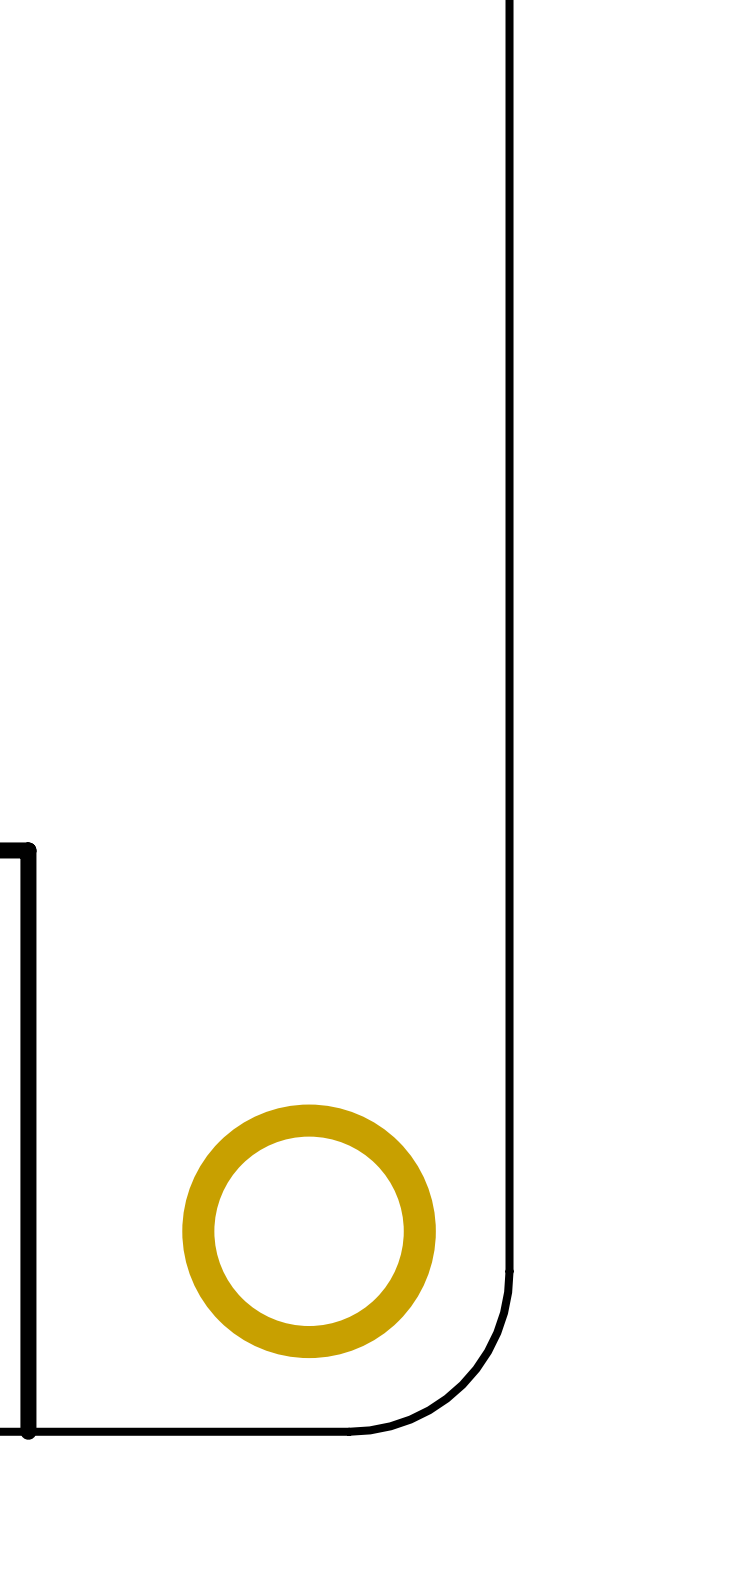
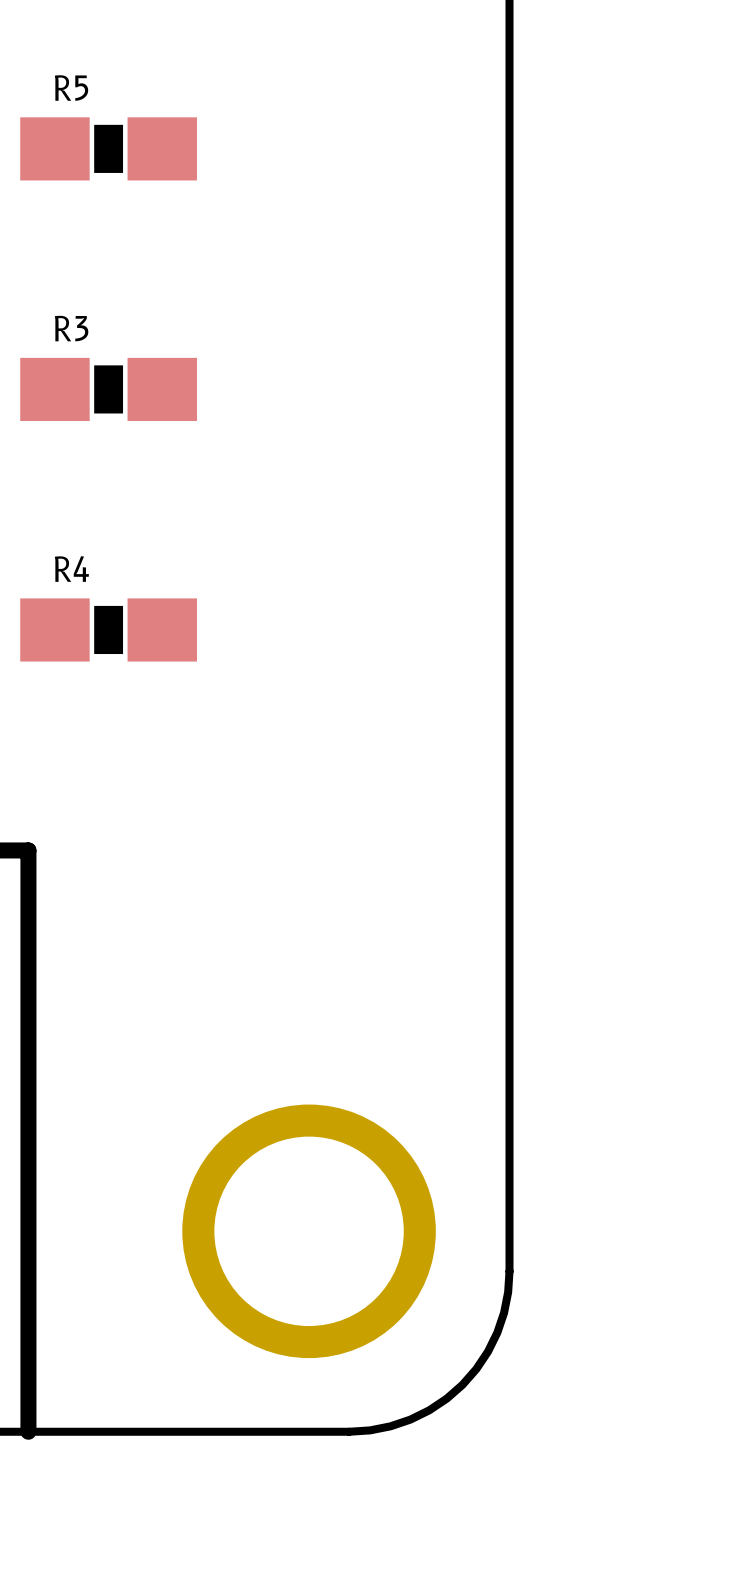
R5: none -> (108, 148)
R3: none -> (108, 389)
R4: none -> (108, 629)

